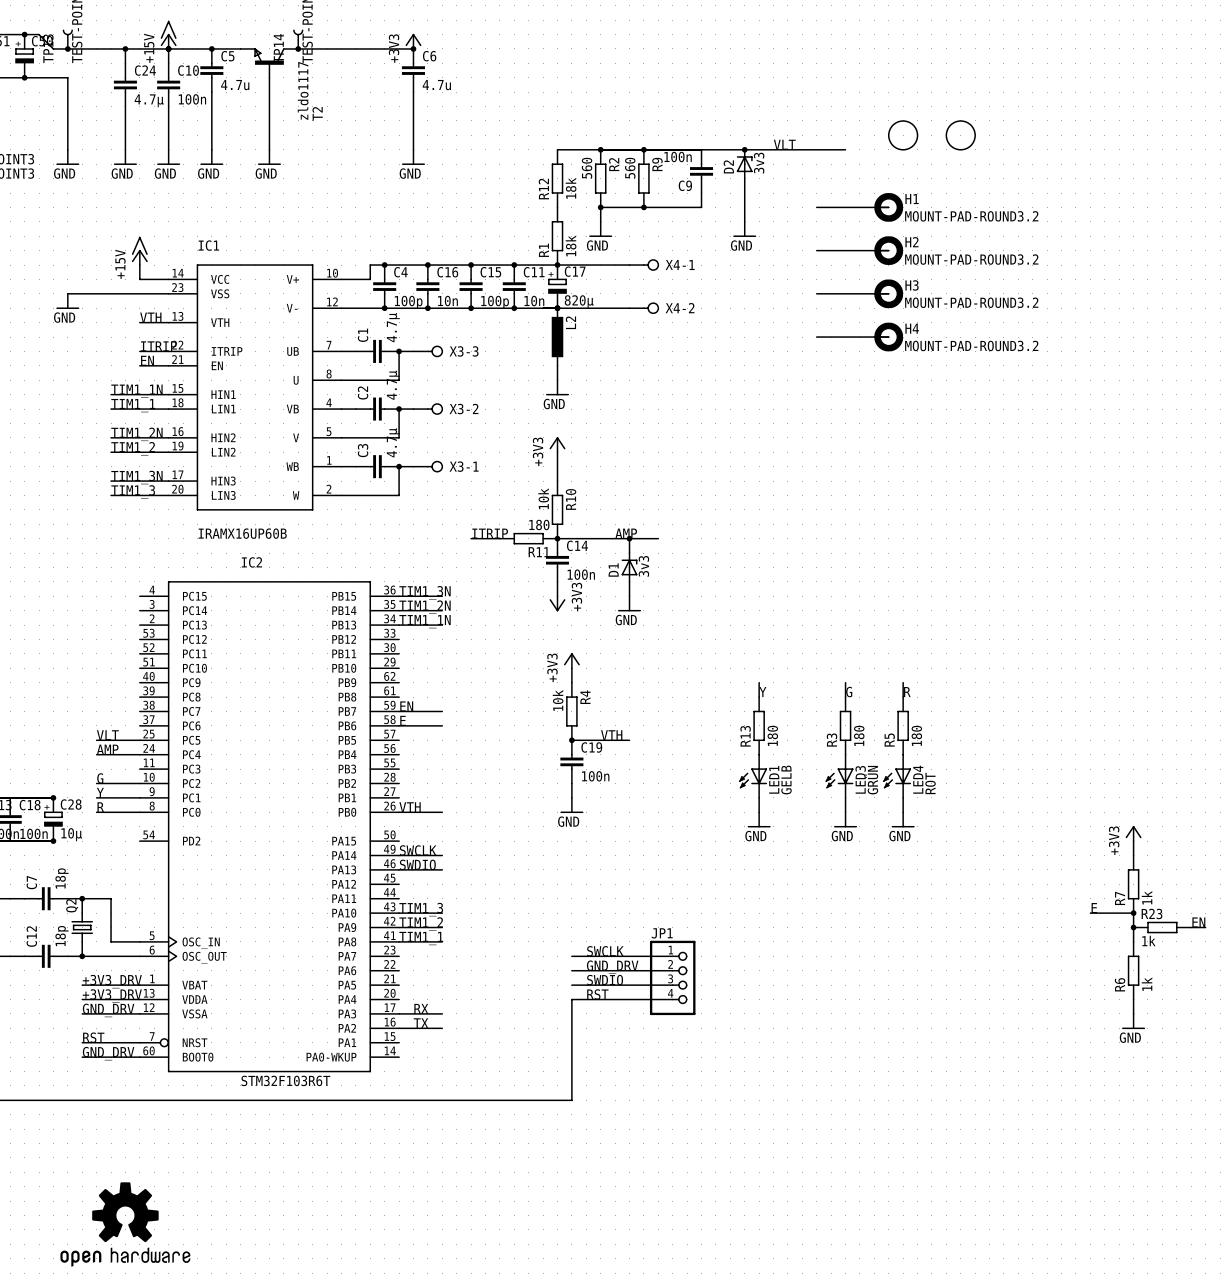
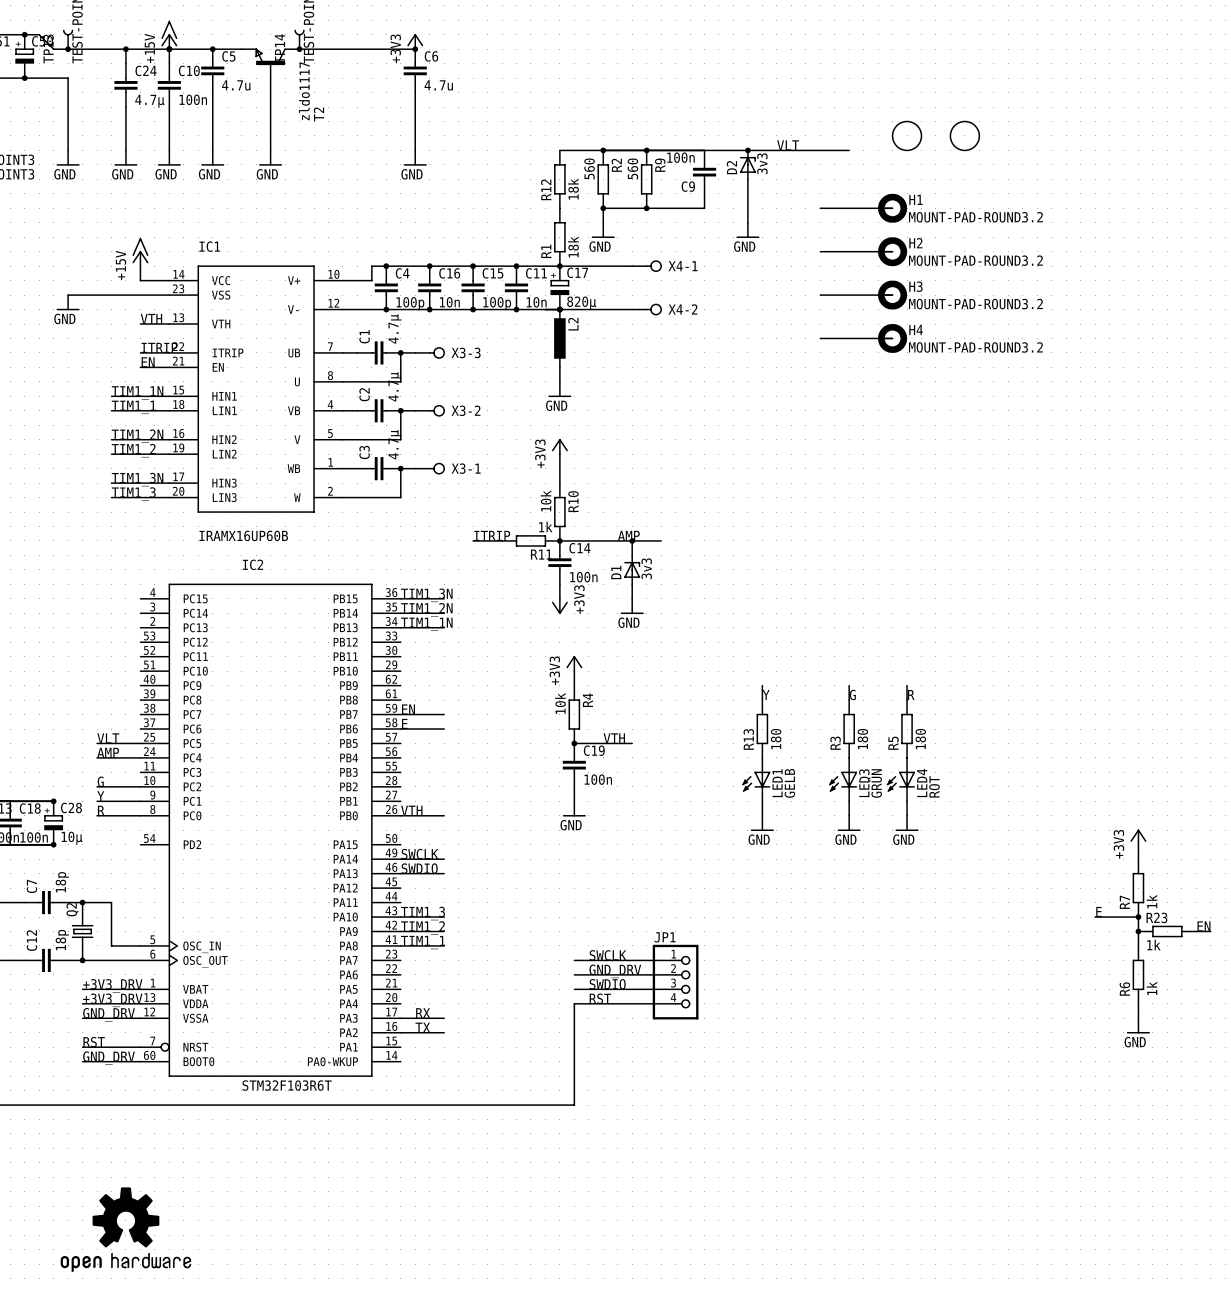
R11 value: 180 (539, 524) -> 1k (545, 527)

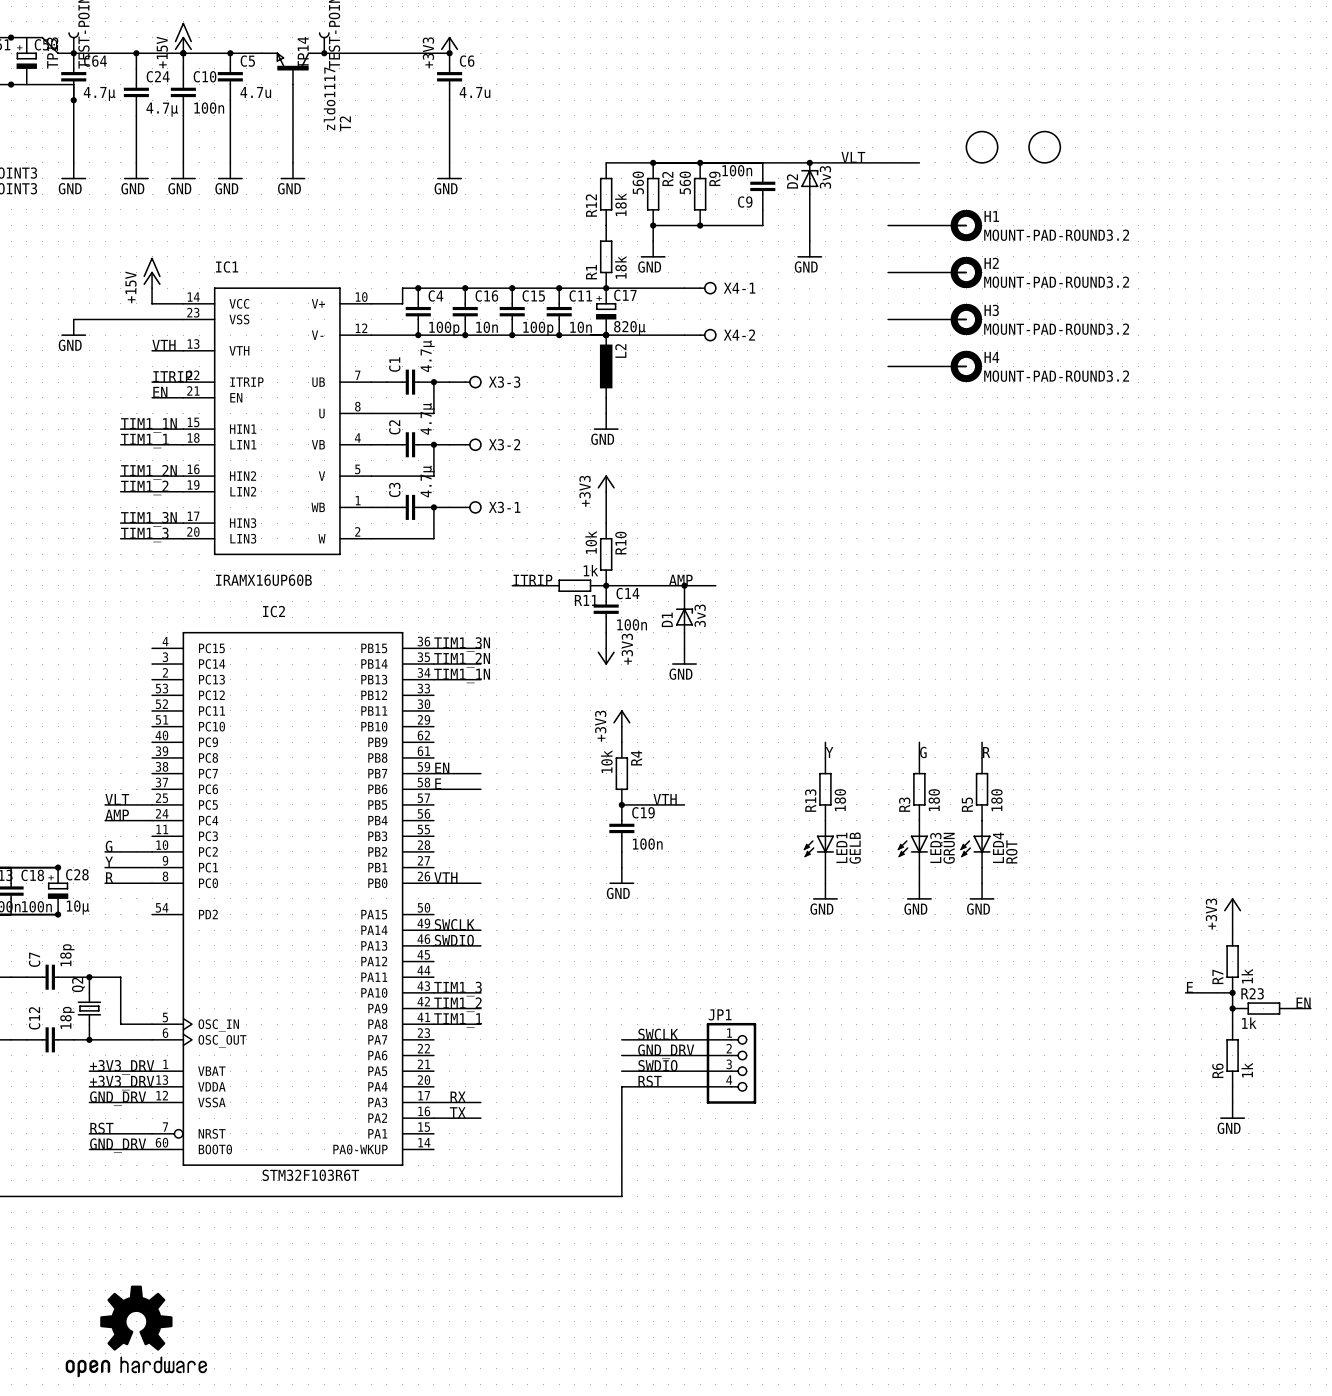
junction: none -> (11, 37)
junction: (24, 34) -> none
C64: none -> 4.7µ (73, 76)
junction: none -> (11, 84)
junction: (24, 78) -> none
junction: none -> (73, 100)

